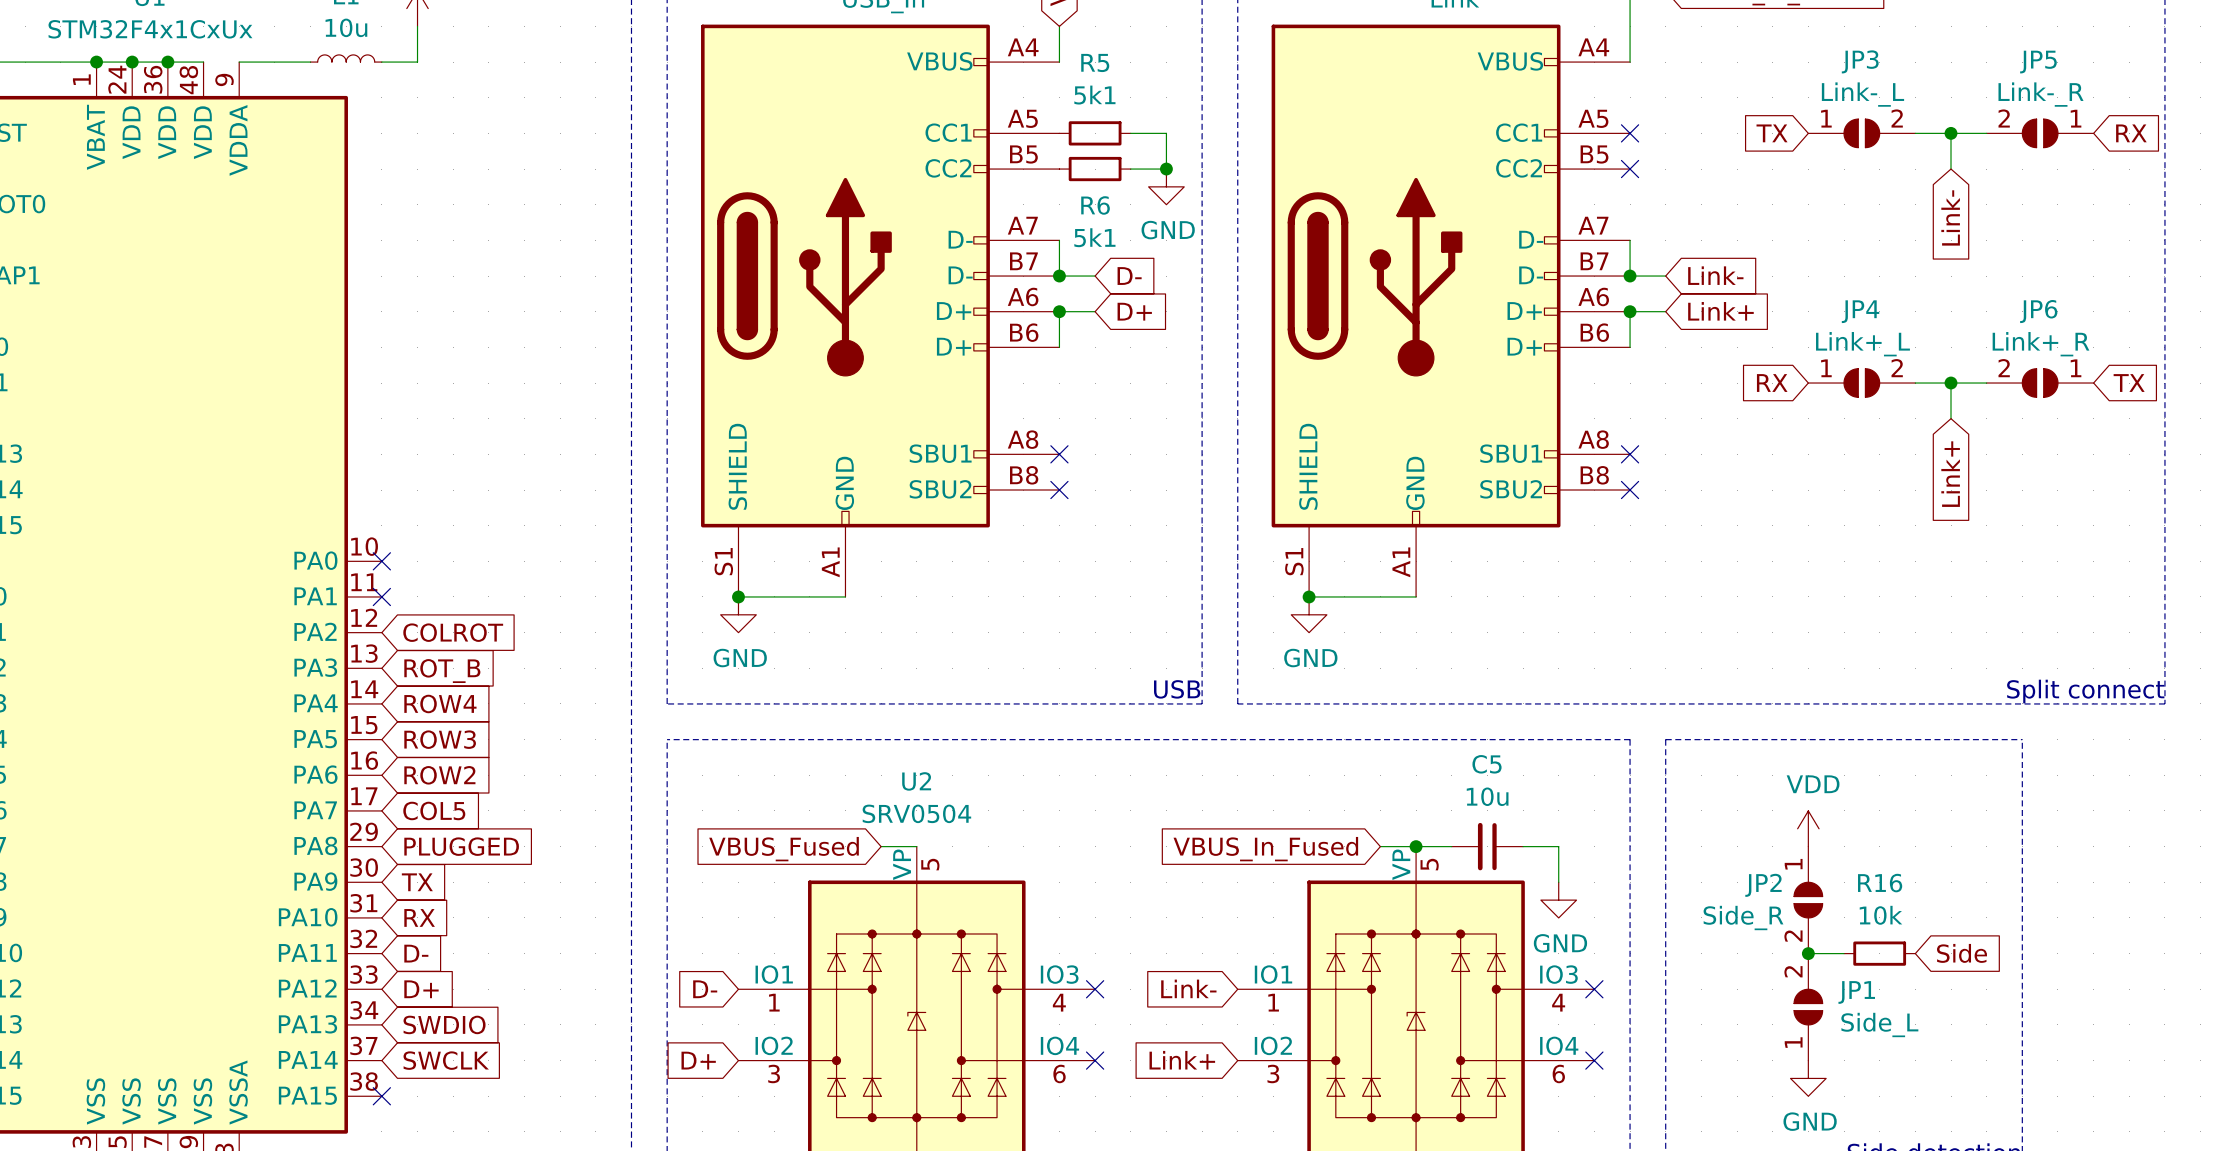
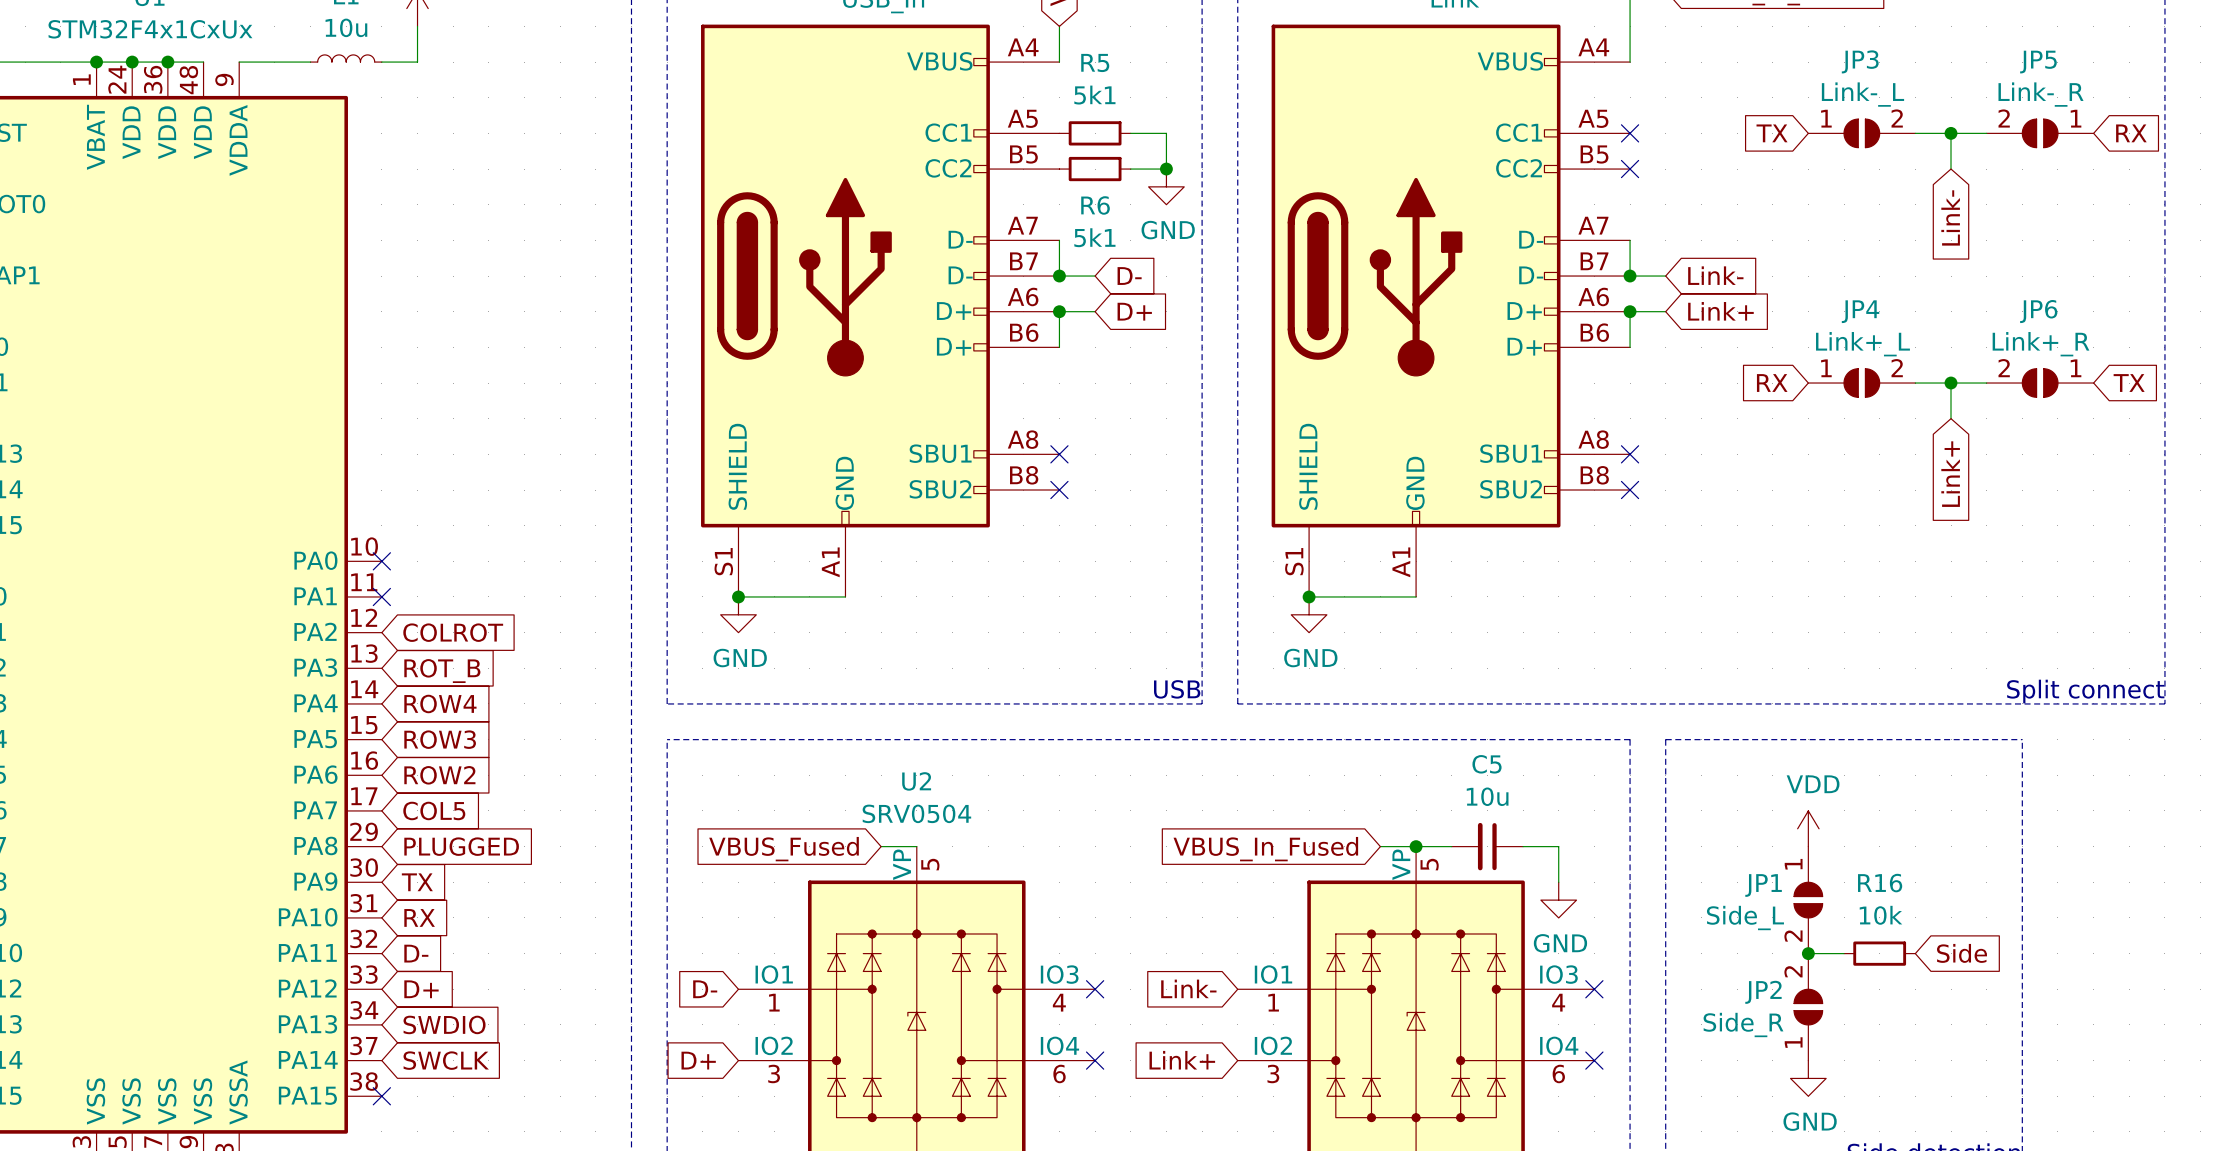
JP2 name: JP2 (1763, 885) -> JP1 (1763, 885)
JP2 value: Side_R (1743, 918) -> Side_L (1745, 918)
JP1 name: JP1 (1856, 992) -> JP2 (1763, 992)
JP1 value: Side_L (1879, 1024) -> Side_R (1743, 1024)

